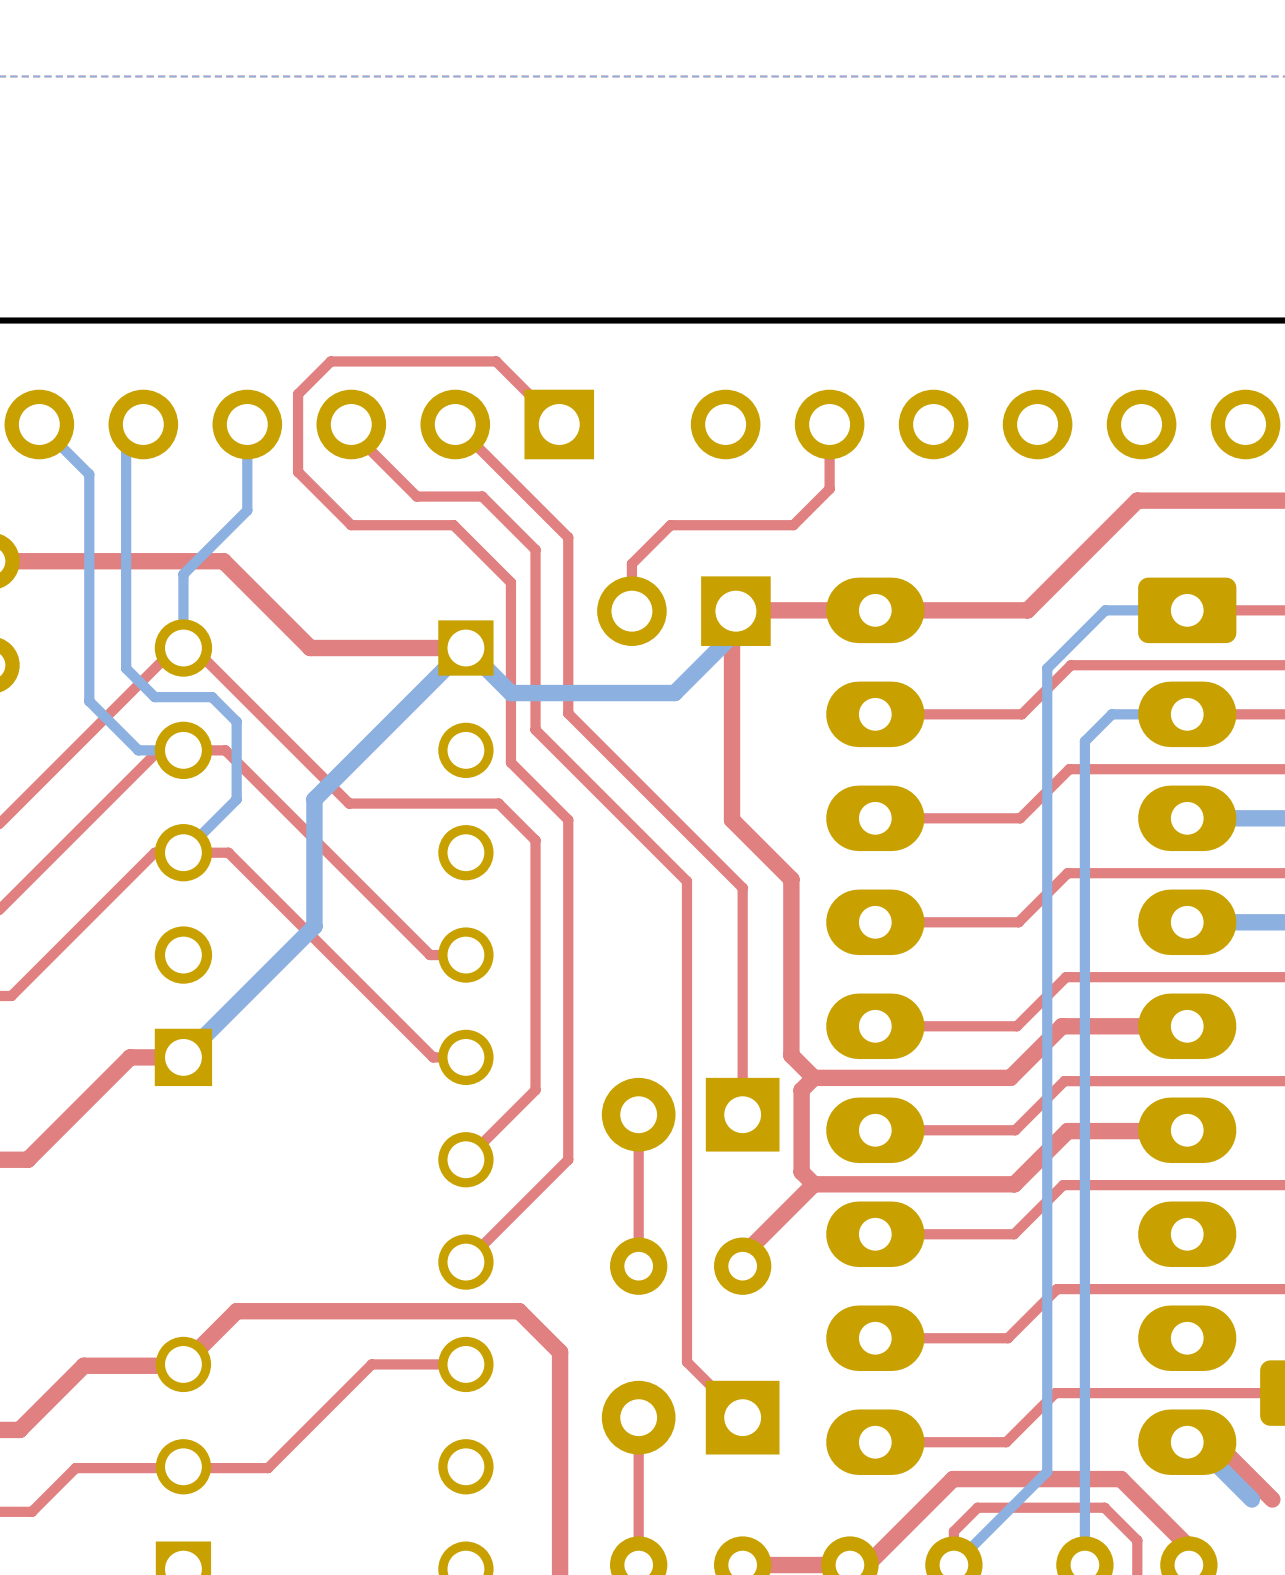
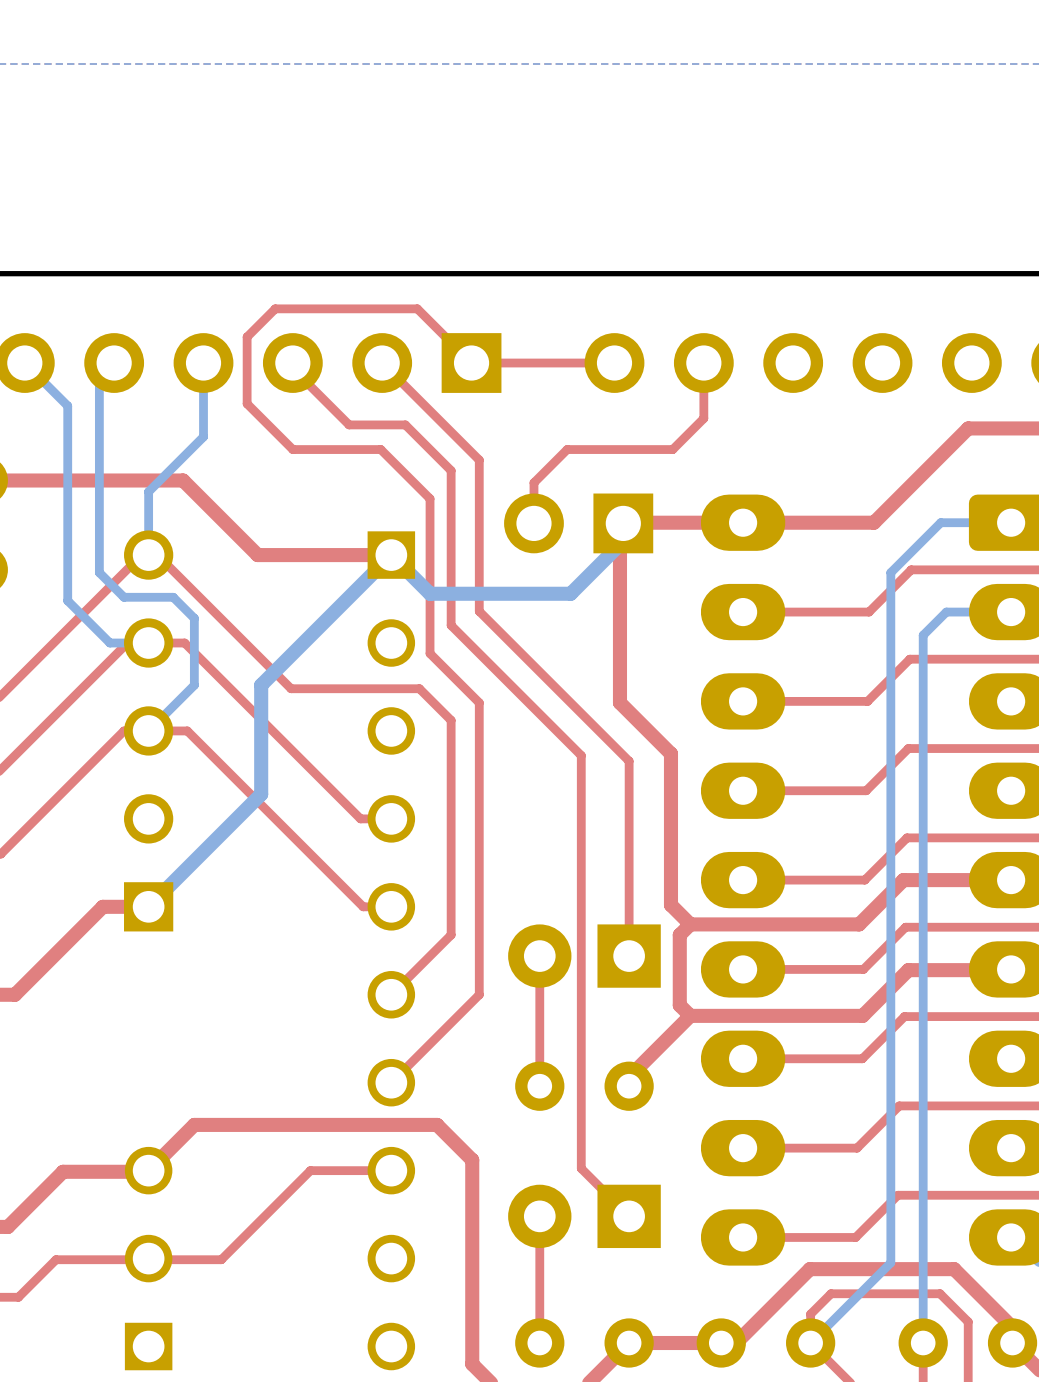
top track: none -> (614, 363) (471, 363)

